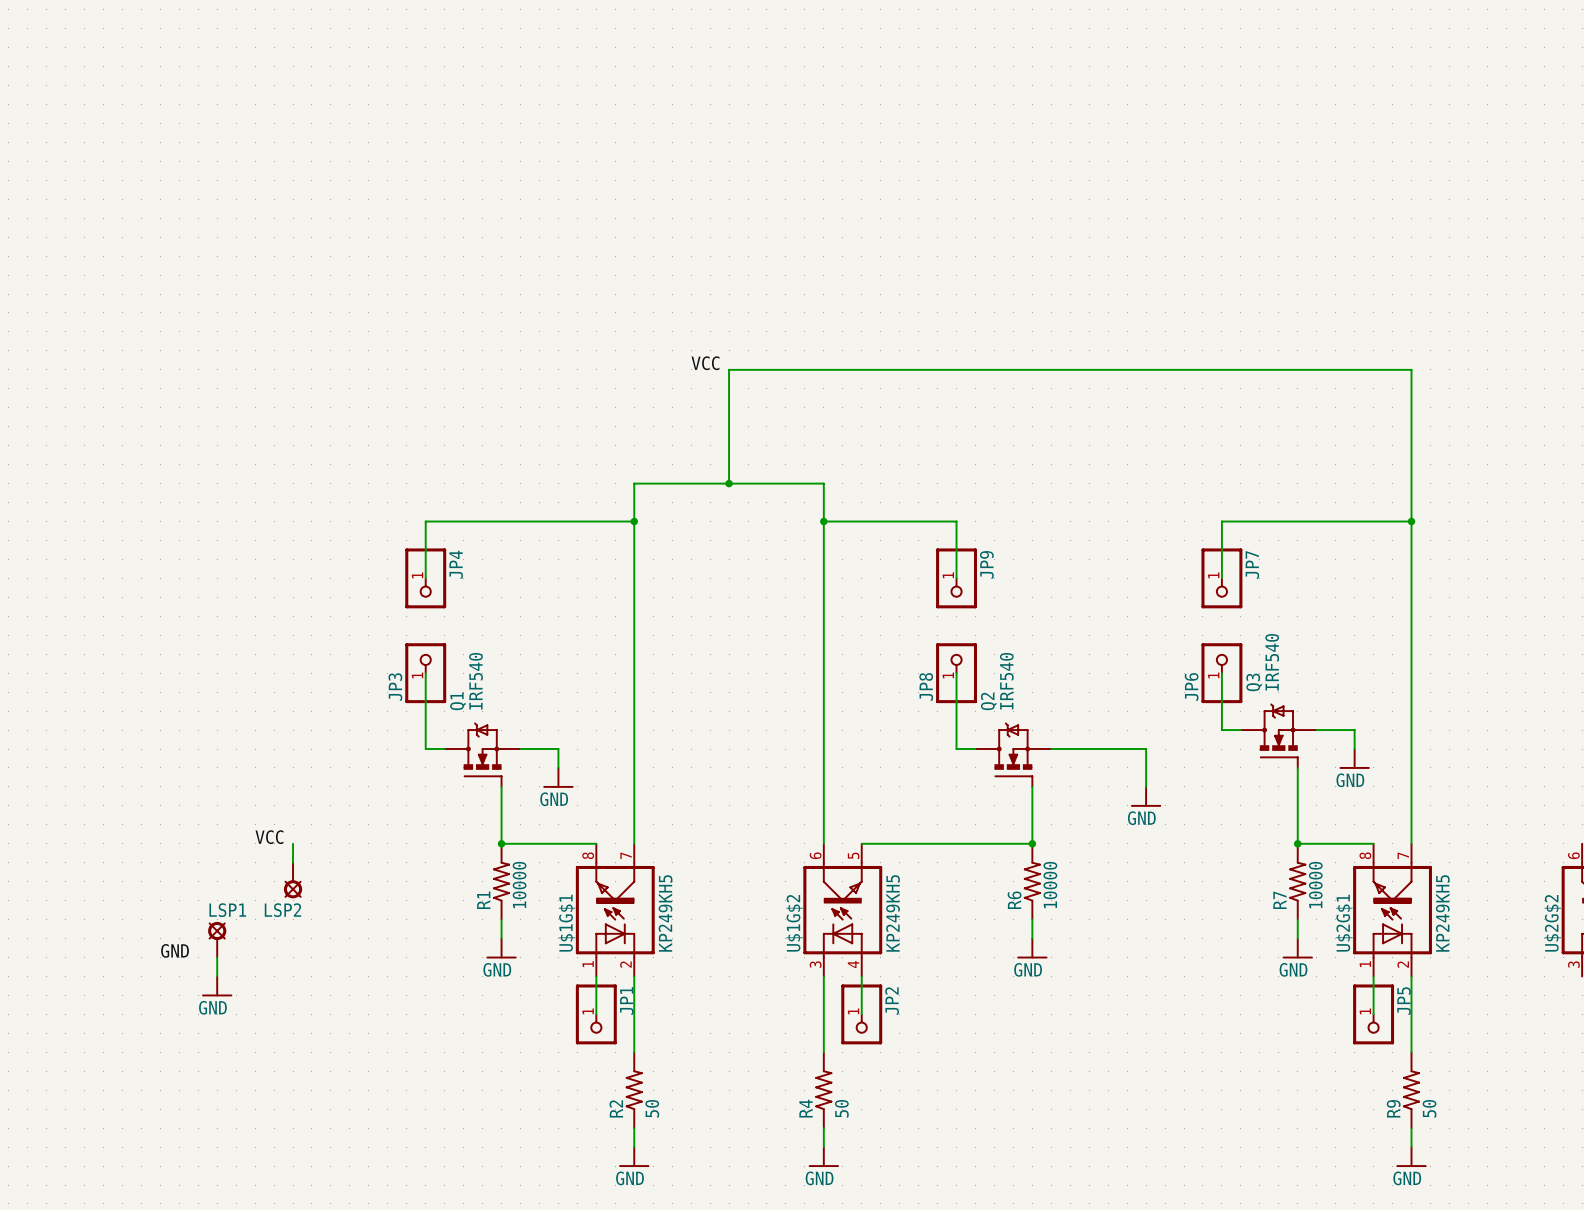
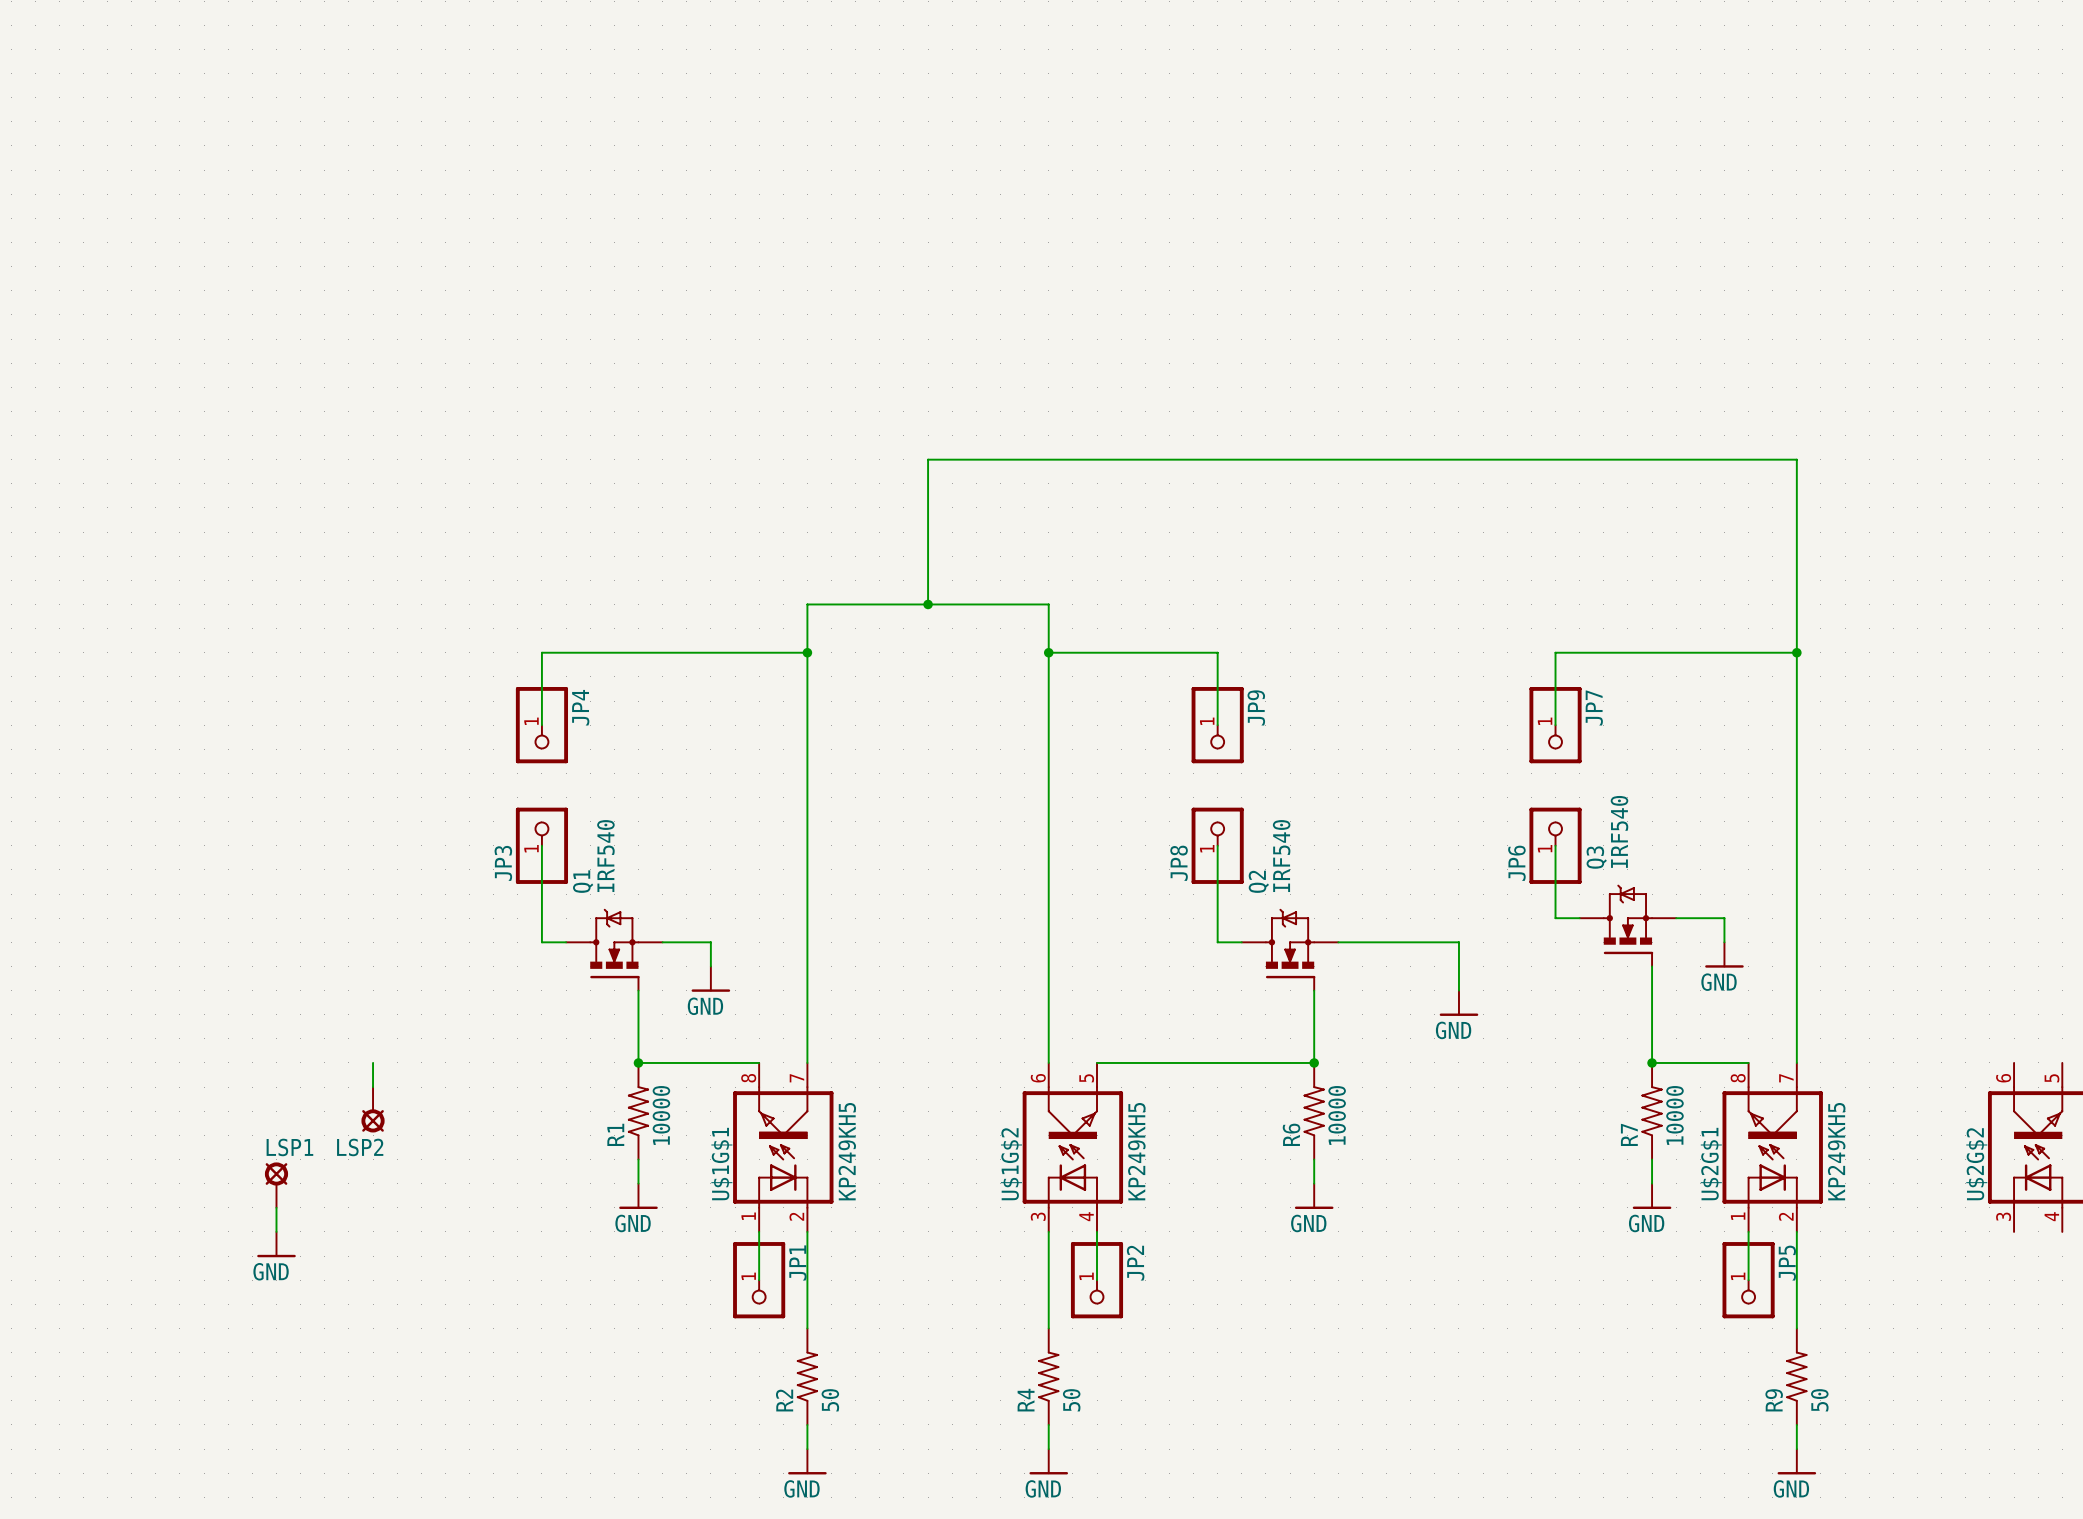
label: VCC (705, 363) -> none
label: VCC (269, 837) -> none
label: GND (175, 950) -> none

